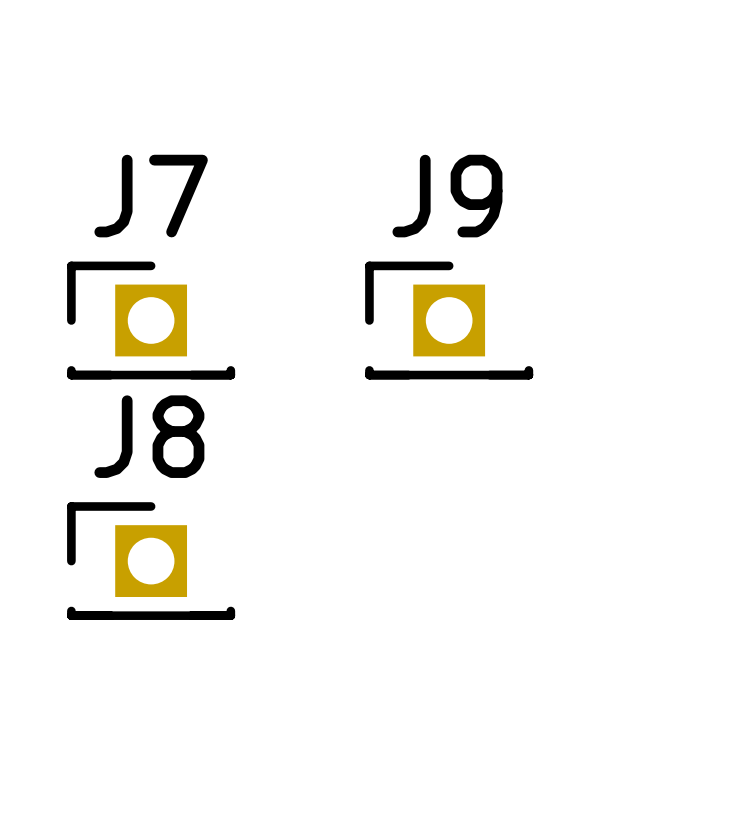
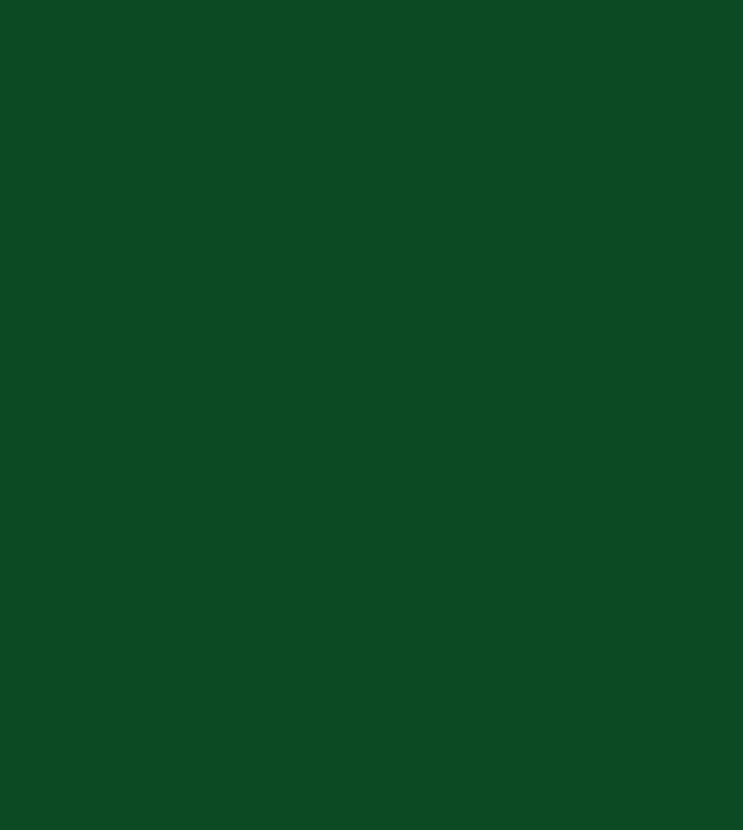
J7: (151, 320) -> none
J9: (449, 320) -> none
J8: (151, 561) -> none

